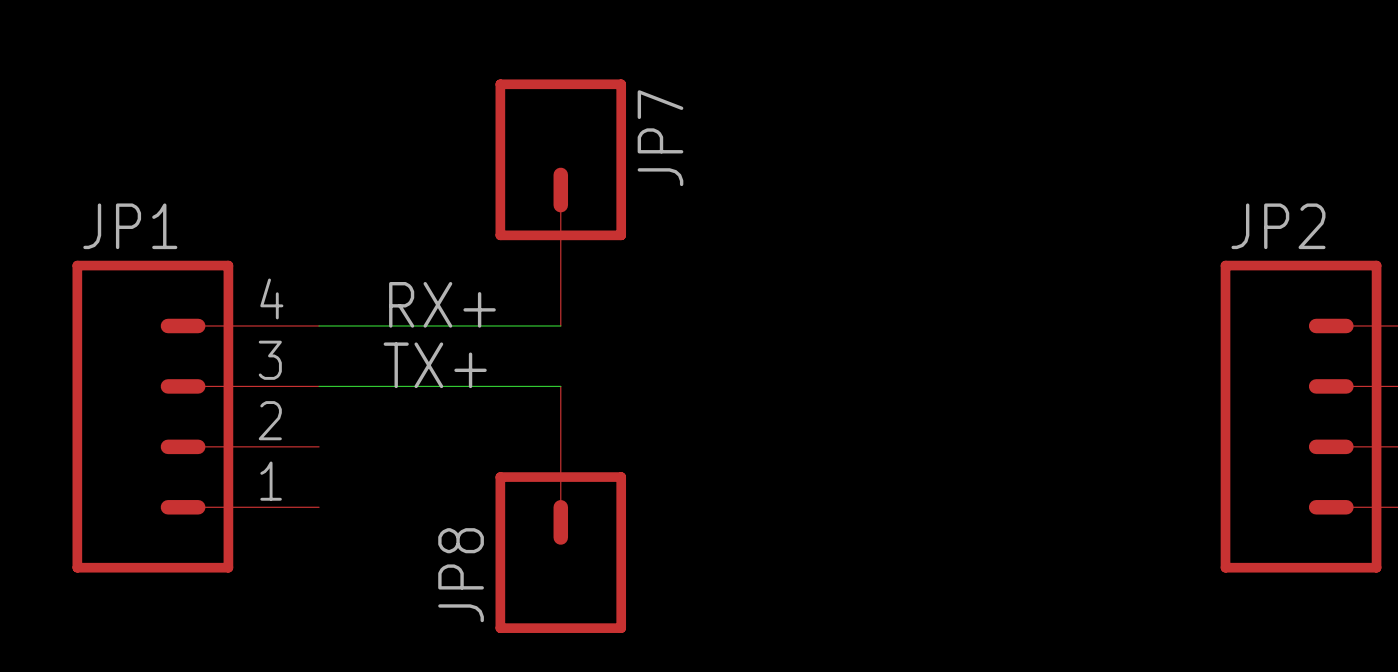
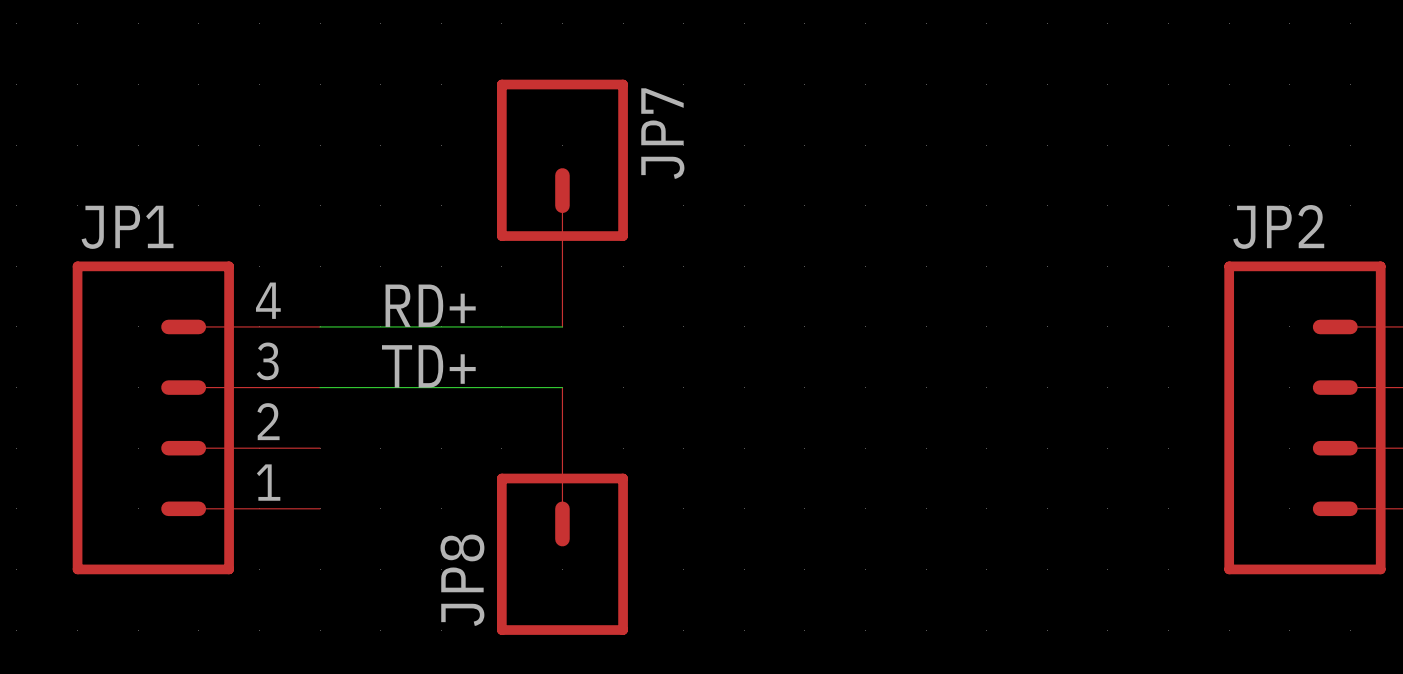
label: RX+ (442, 304) -> RD+ (430, 305)
label: TX+ (435, 365) -> TD+ (428, 366)

